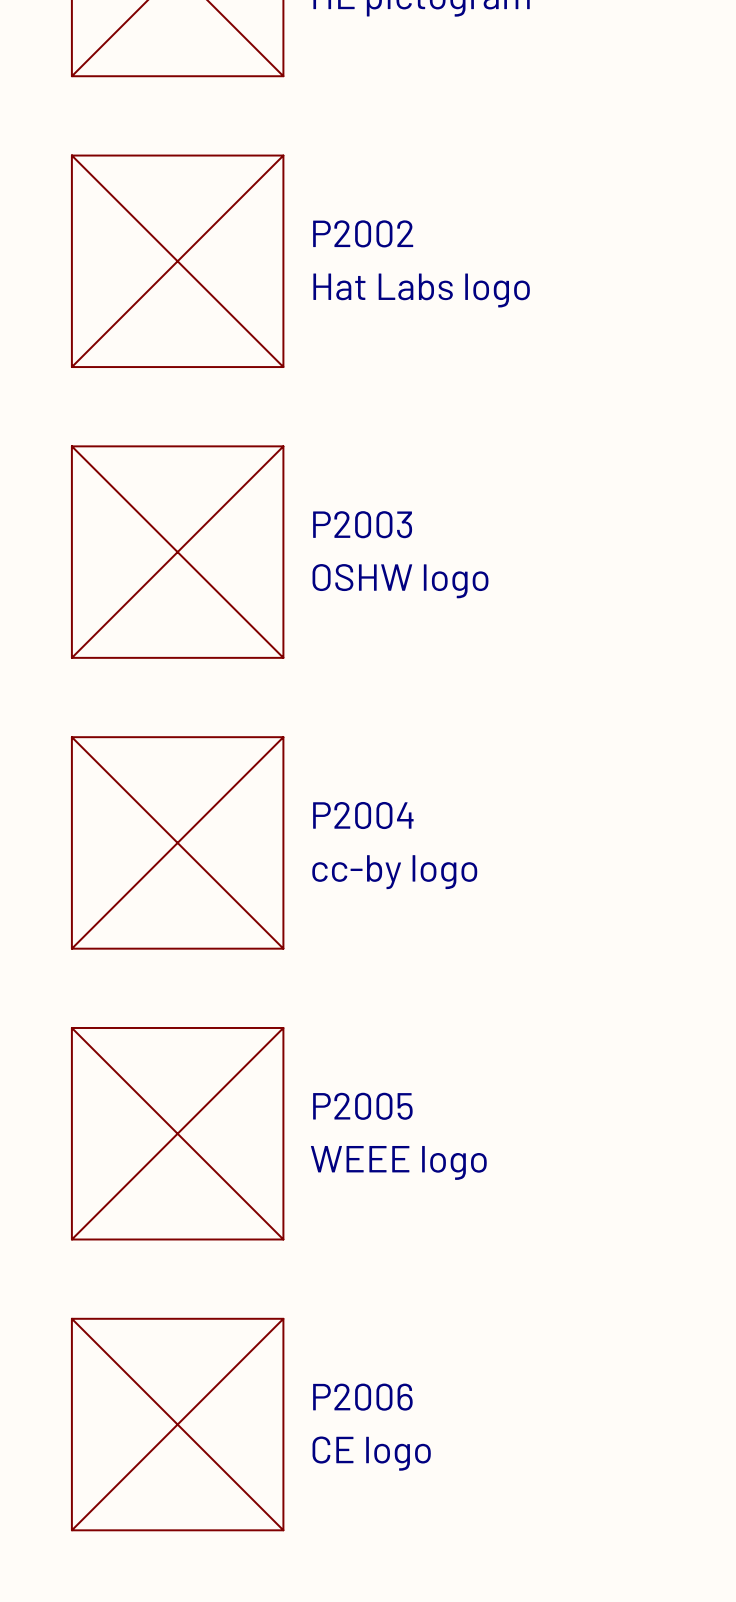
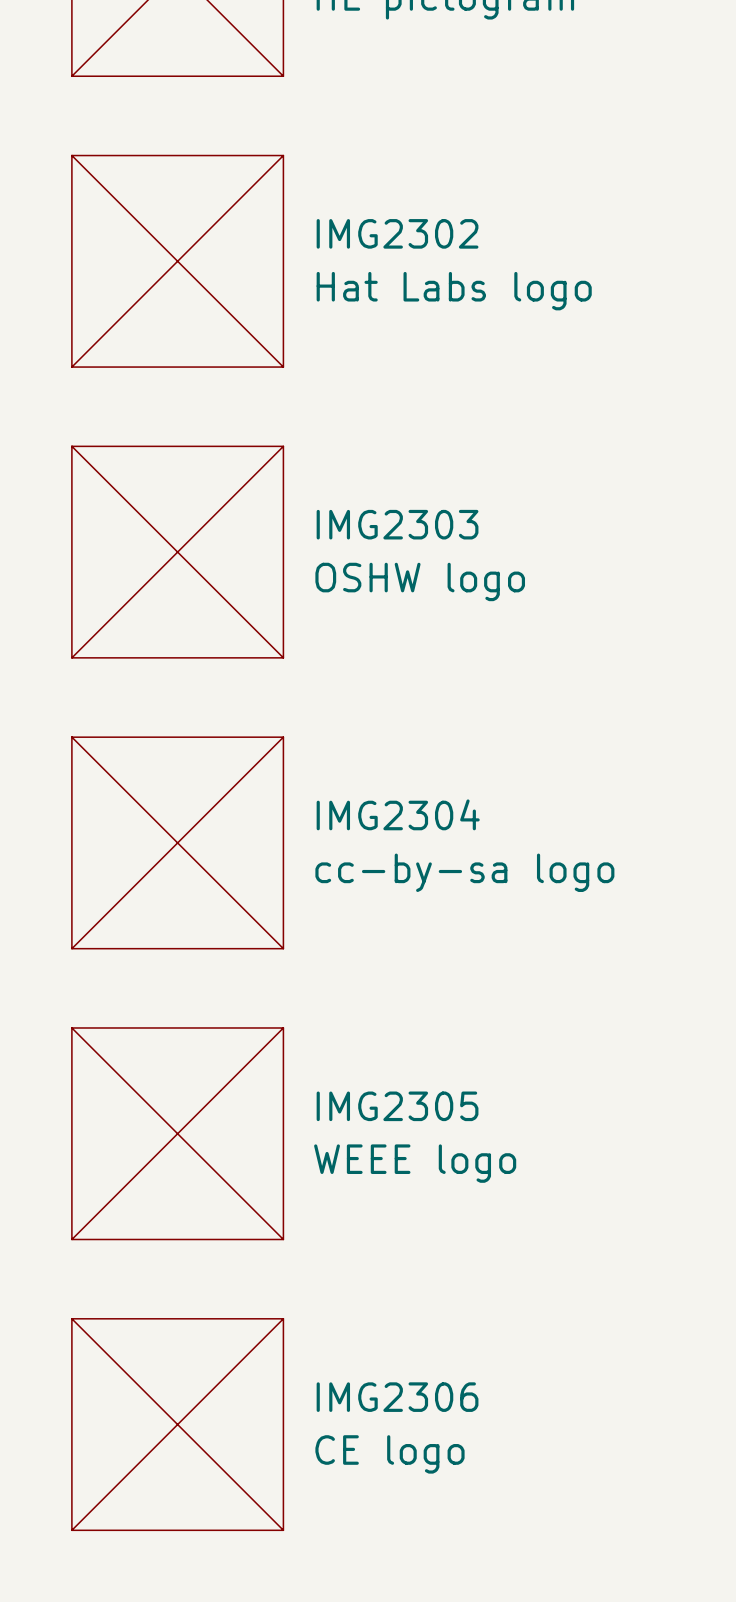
P2002 name: P2002 (363, 233) -> IMG2302 (397, 233)
P2003 name: P2003 (362, 524) -> IMG2303 (397, 524)
P2004 name: P2004 (363, 815) -> IMG2304 (398, 814)
P2004 value: cc-by logo (394, 872) -> cc-by-sa logo (464, 872)
P2005 name: P2005 (362, 1106) -> IMG2305 (397, 1106)
P2006 name: P2006 (362, 1397) -> IMG2306 (397, 1397)

